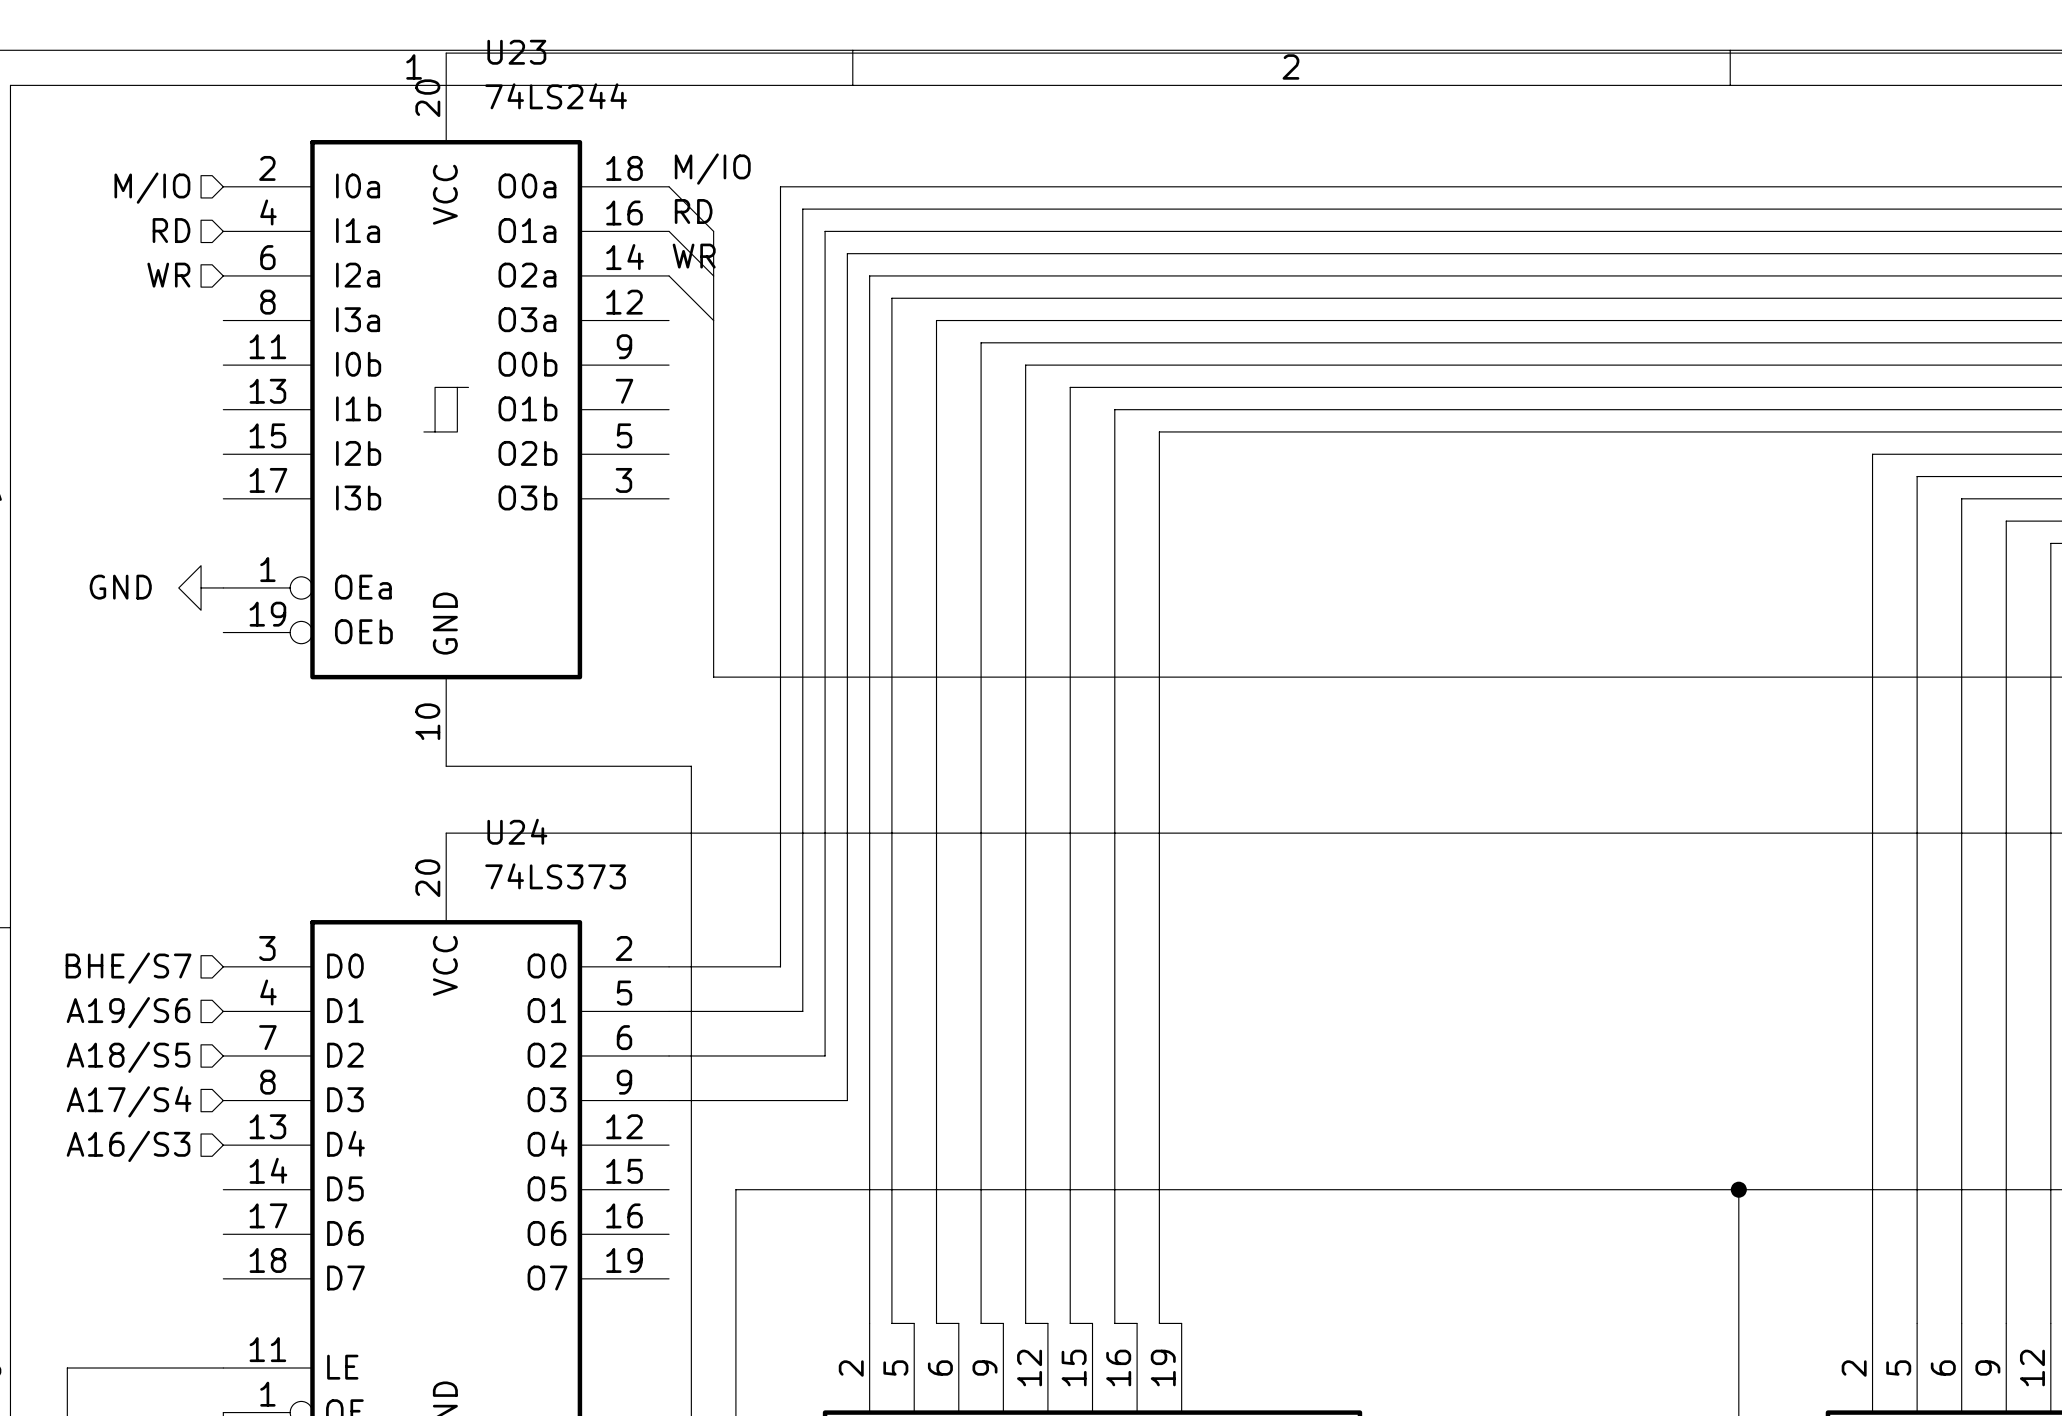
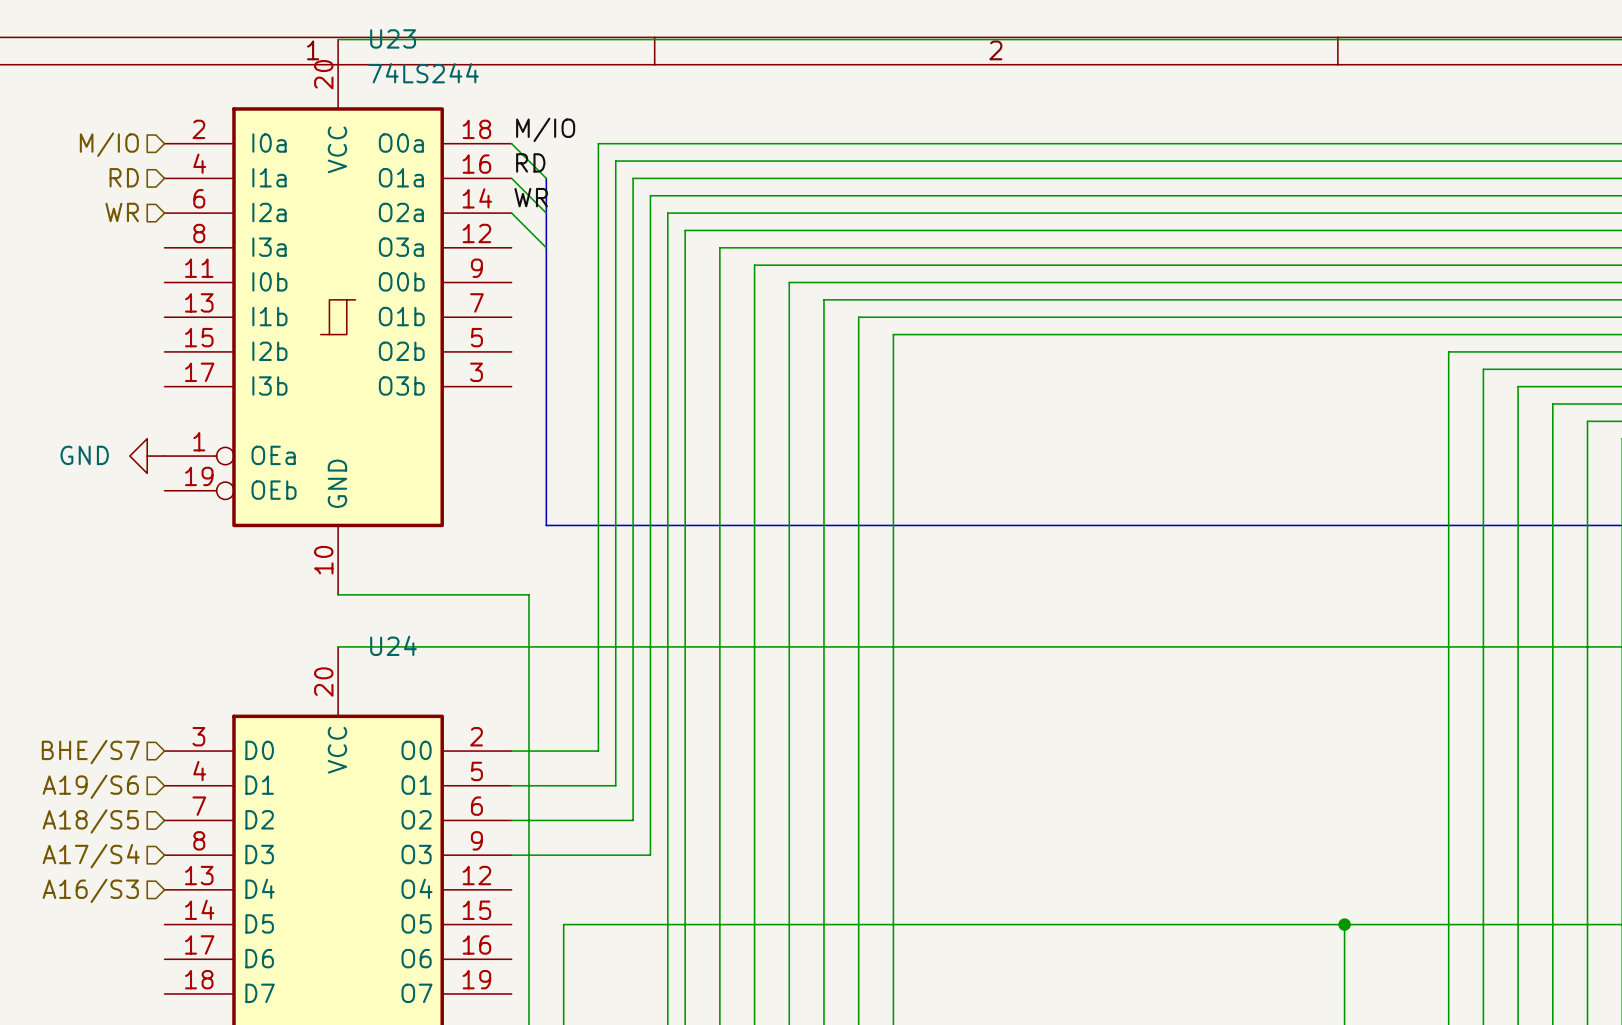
U24 value: 74LS373 (555, 876) -> none

